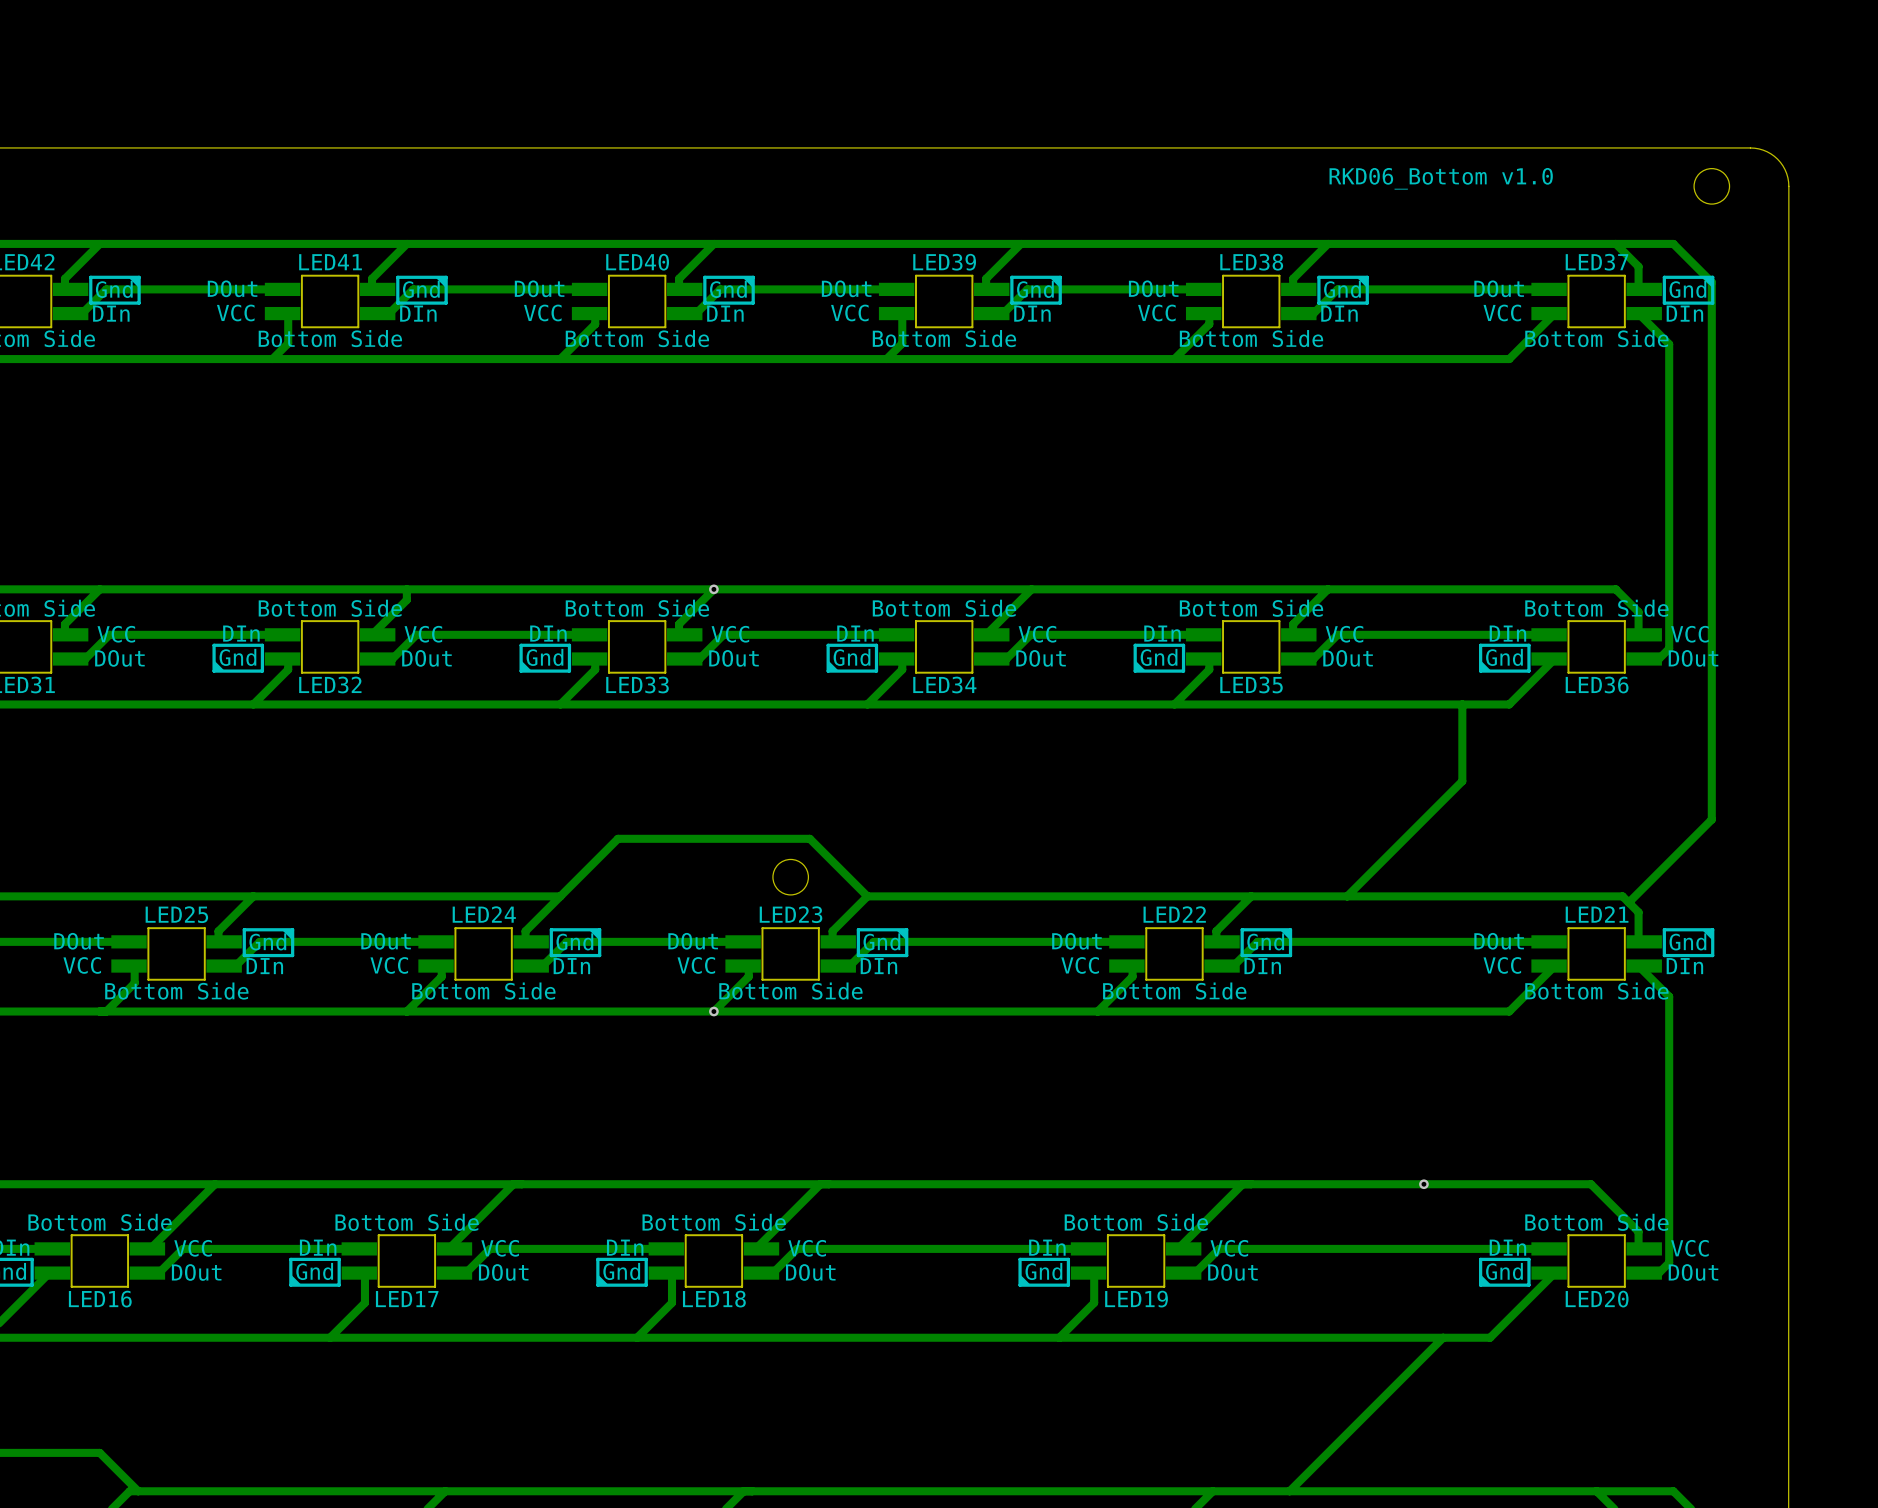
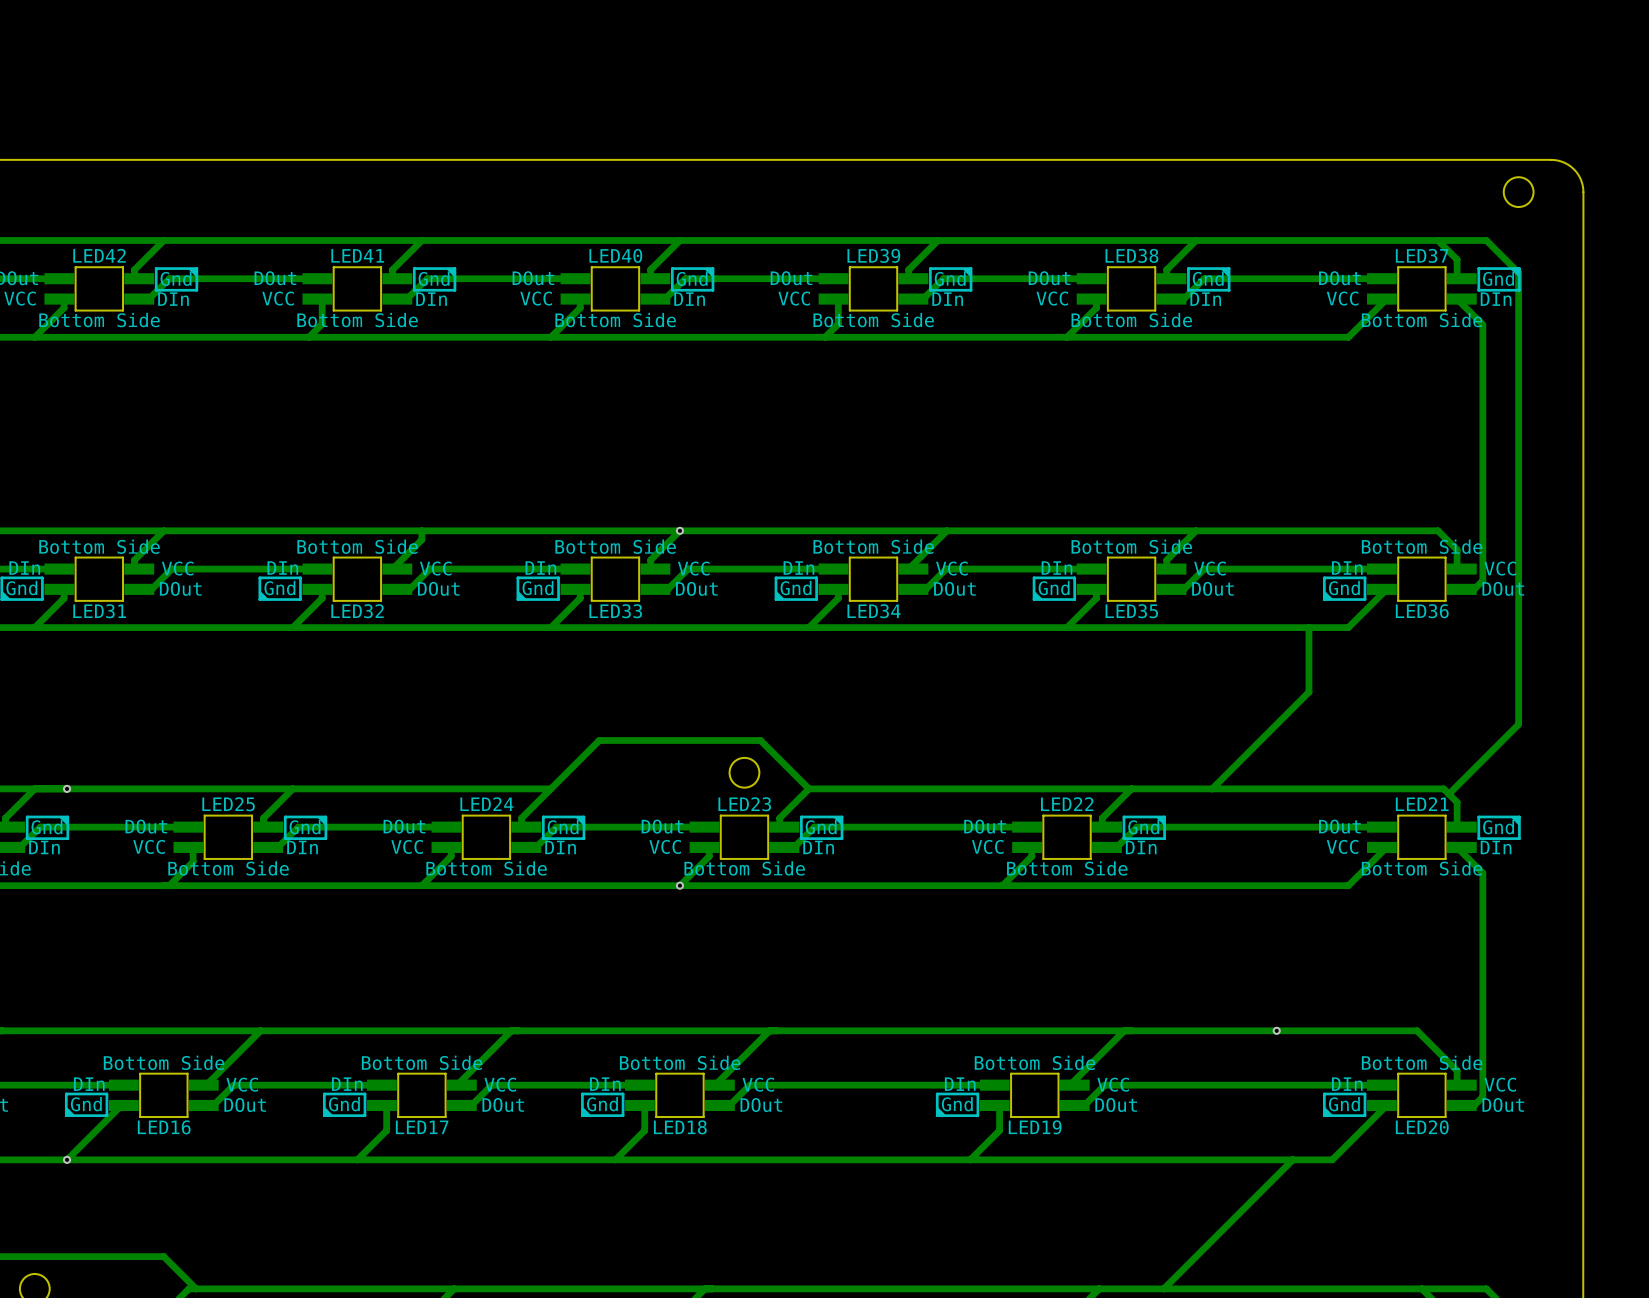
text: RKD06_Bottom v1.0 (1441, 178) -> none

